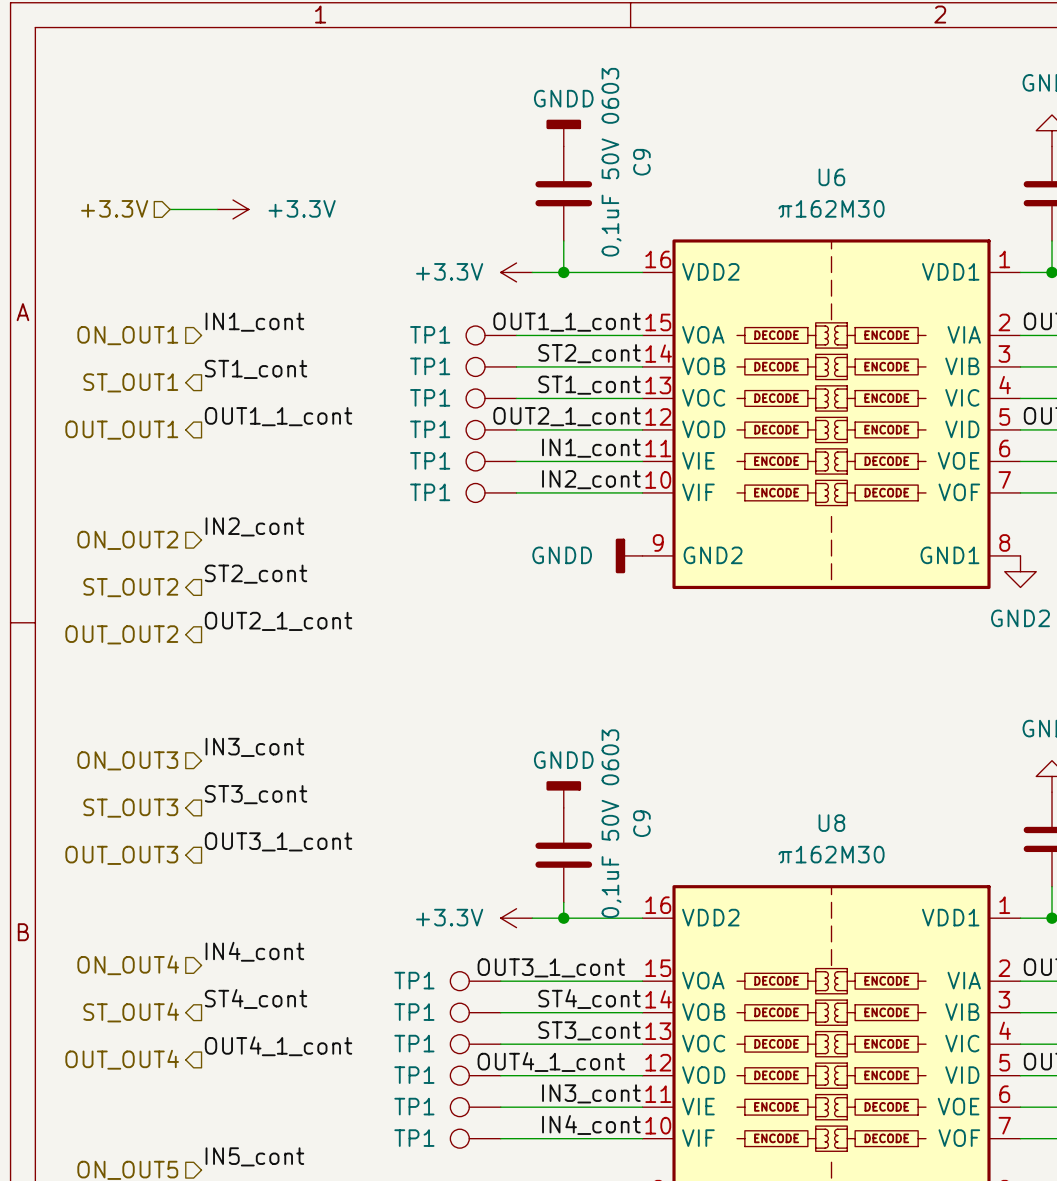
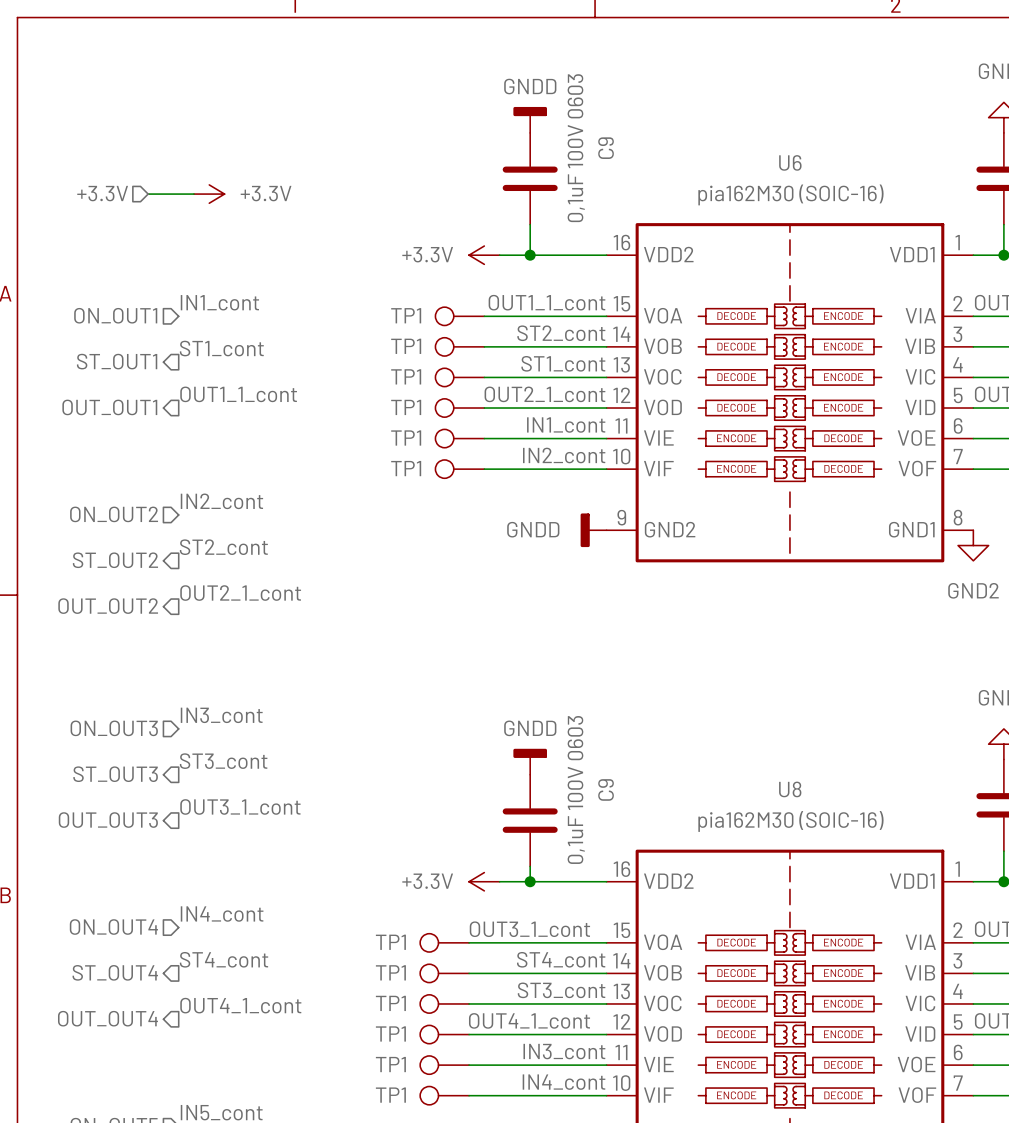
C9 value: 0,1uF 50V 0603 (611, 162) -> 0,1uF 100V 0603 (576, 148)
U6 value: π162M30 (831, 208) -> pia162M30 (SOIC-16) (790, 194)
C9 value: 0,1uF 50V 0603 (611, 823) -> 0,1uF 100V 0603 (576, 789)
U8 value: π162M30 (831, 854) -> pia162M30 (SOIC-16) (790, 821)

